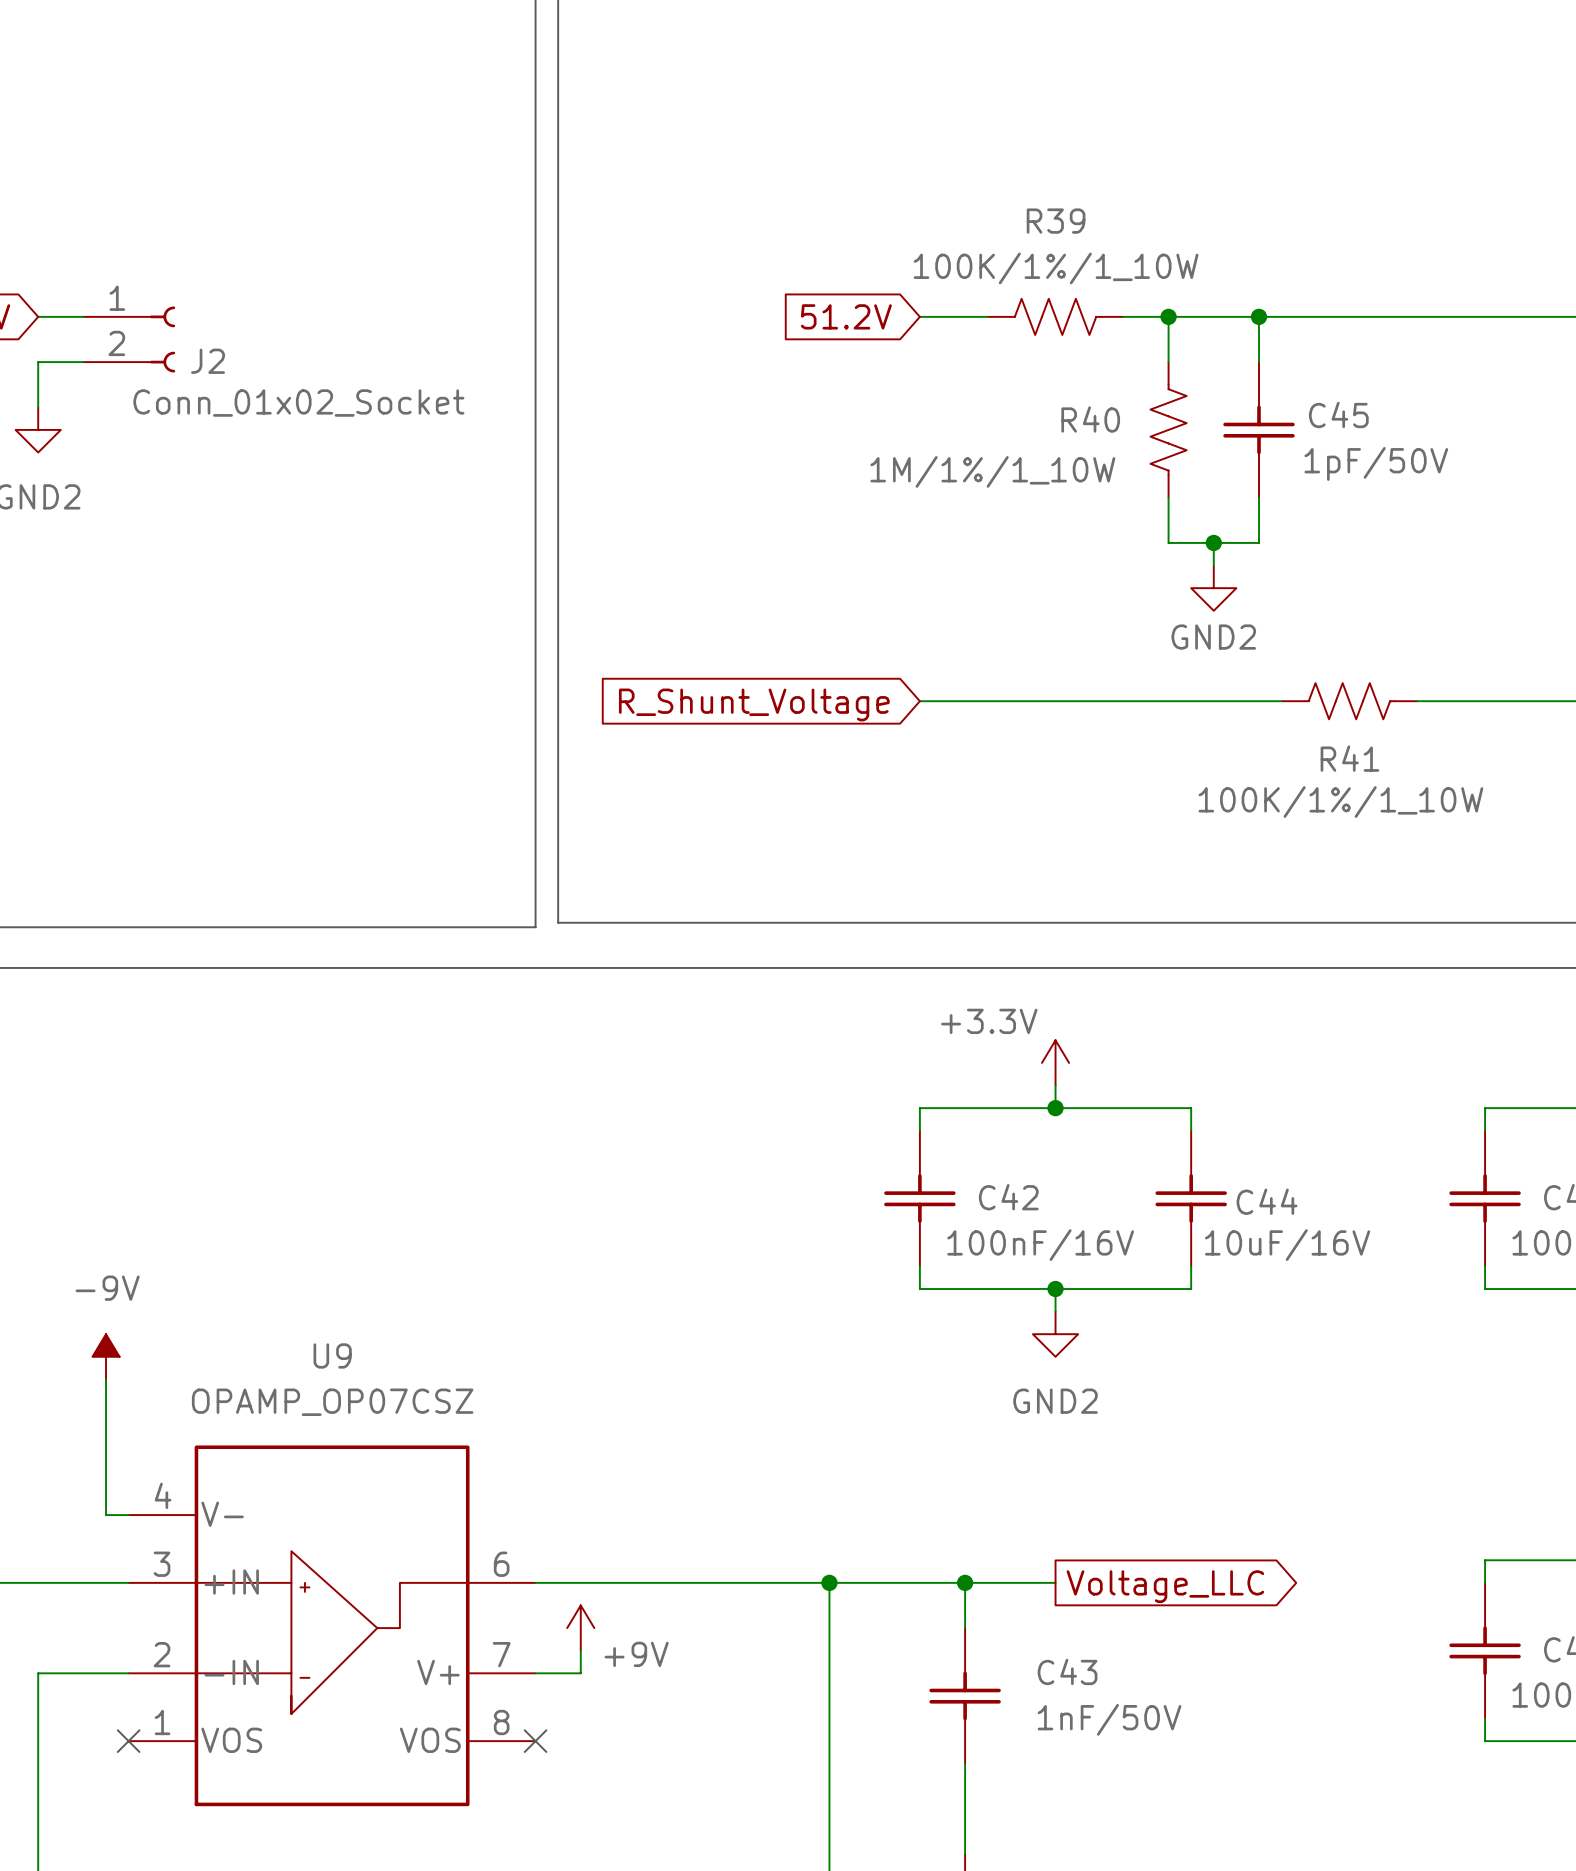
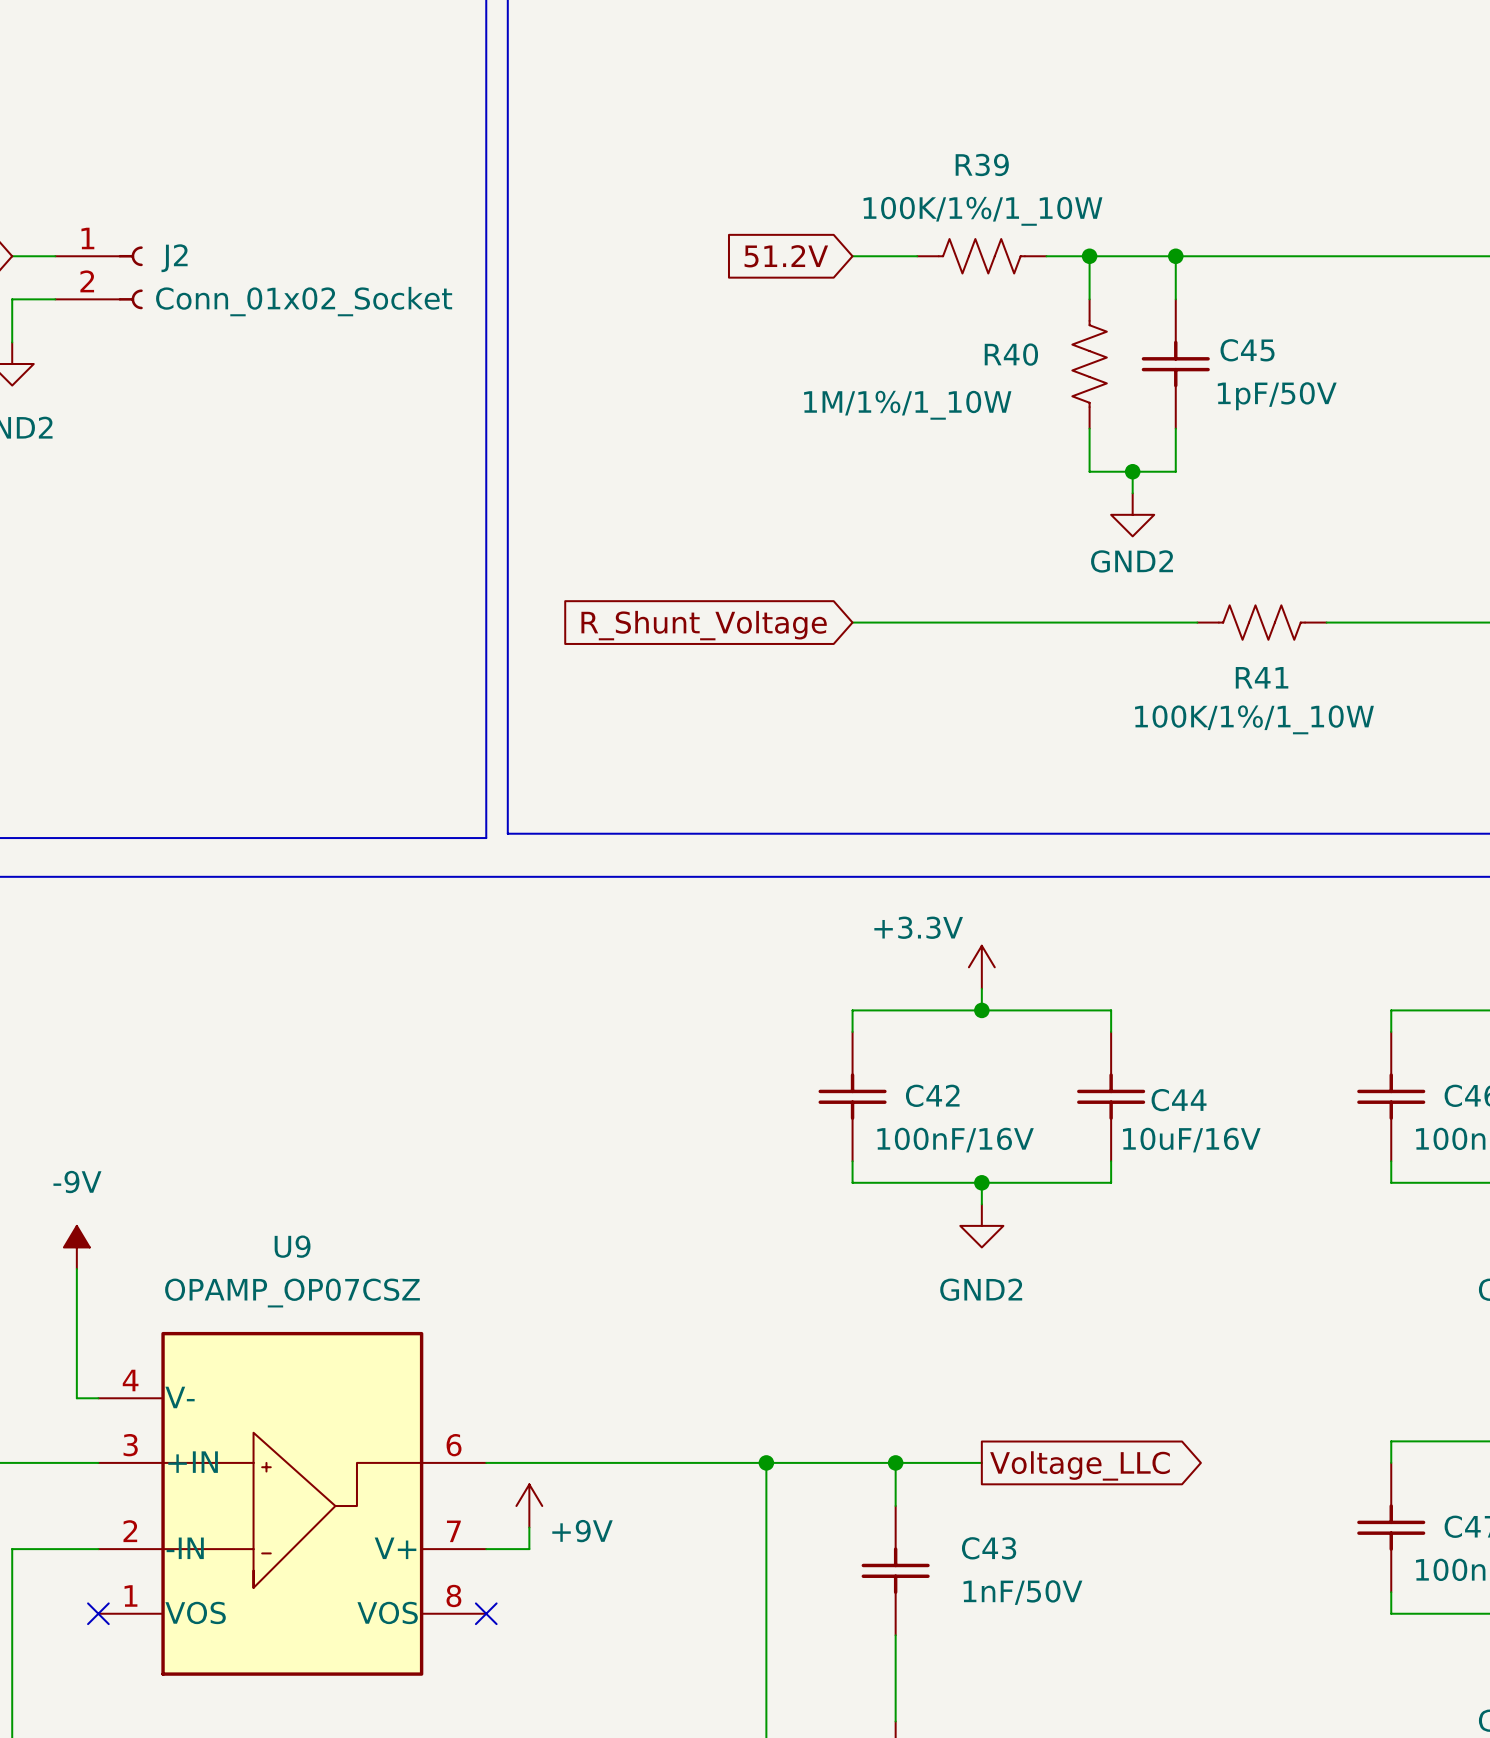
J2 name position: J2 (208, 361) -> J2 (174, 258)
J2 value position: Conn_01x02_Socket (298, 403) -> Conn_01x02_Socket (304, 301)

